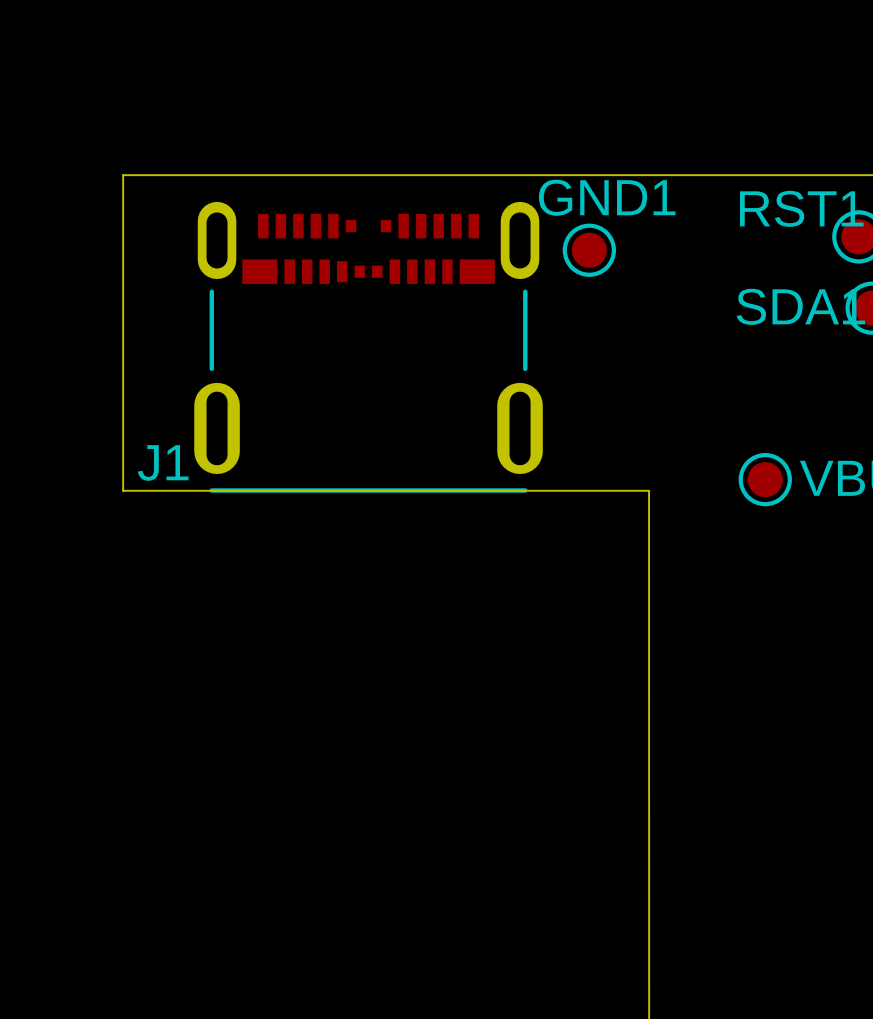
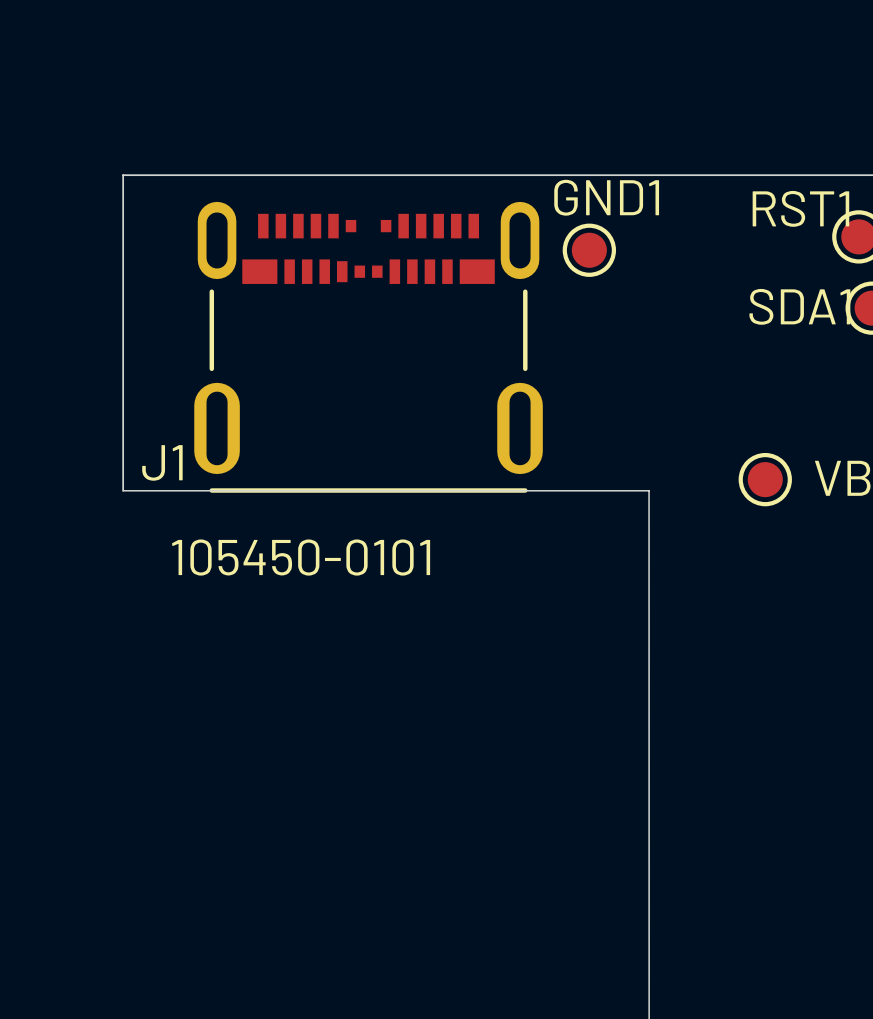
J1 value: none -> 105450-0101 (301, 557)

